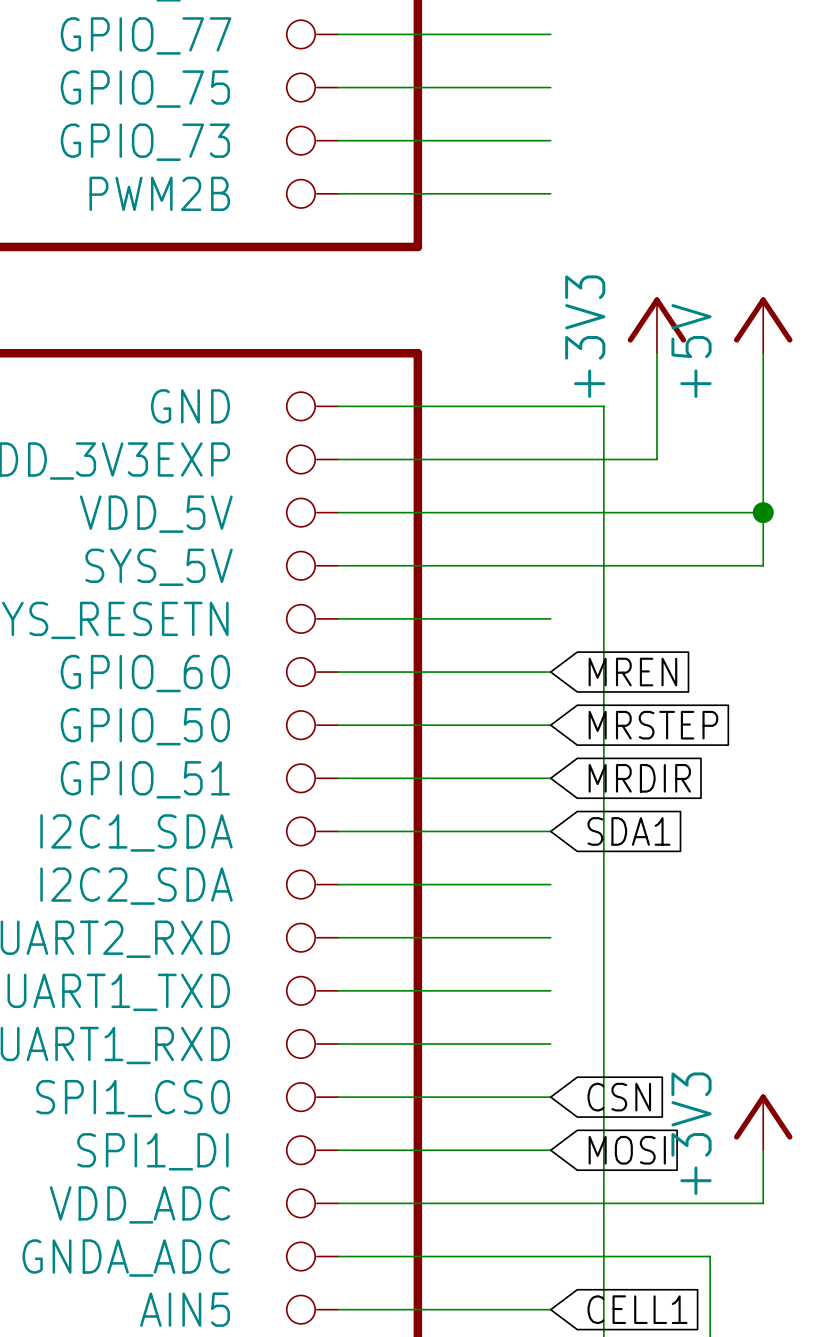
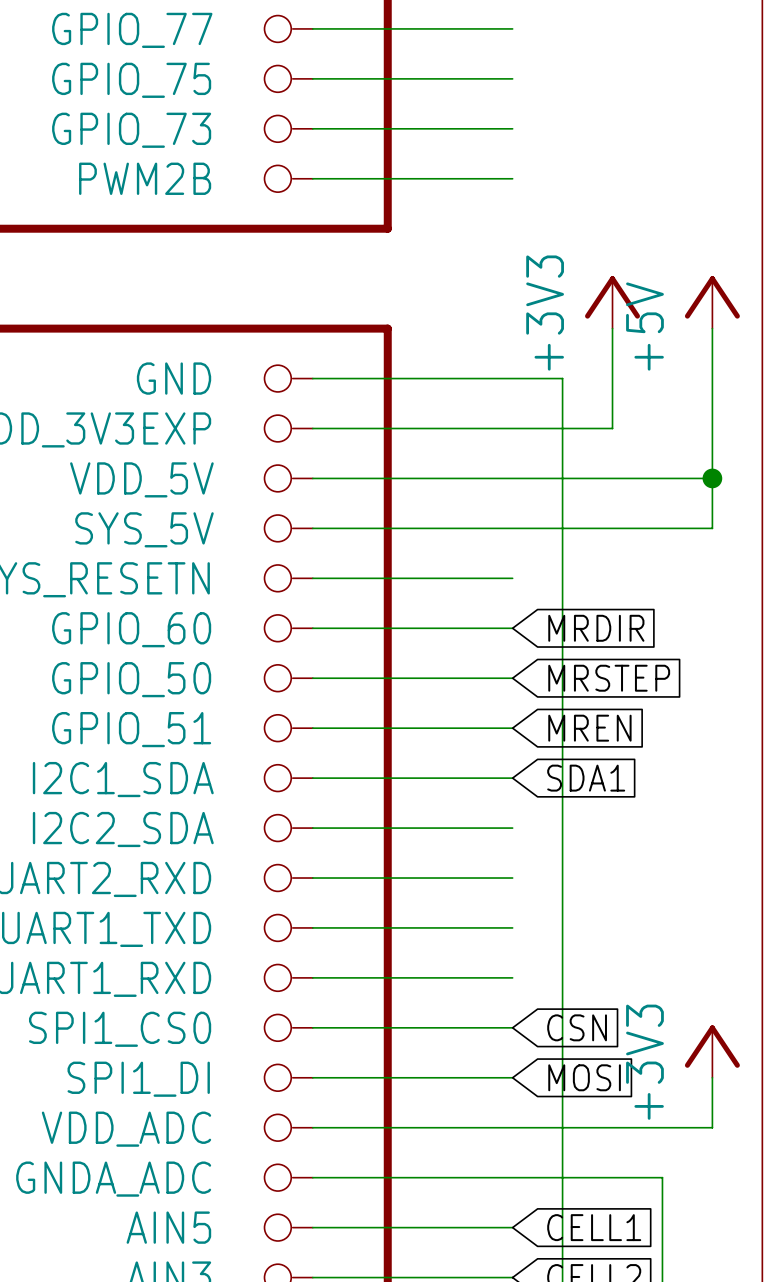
global label: MREN (632, 672) -> MRDIR (596, 628)
global label: MRDIR (639, 778) -> MREN (589, 728)

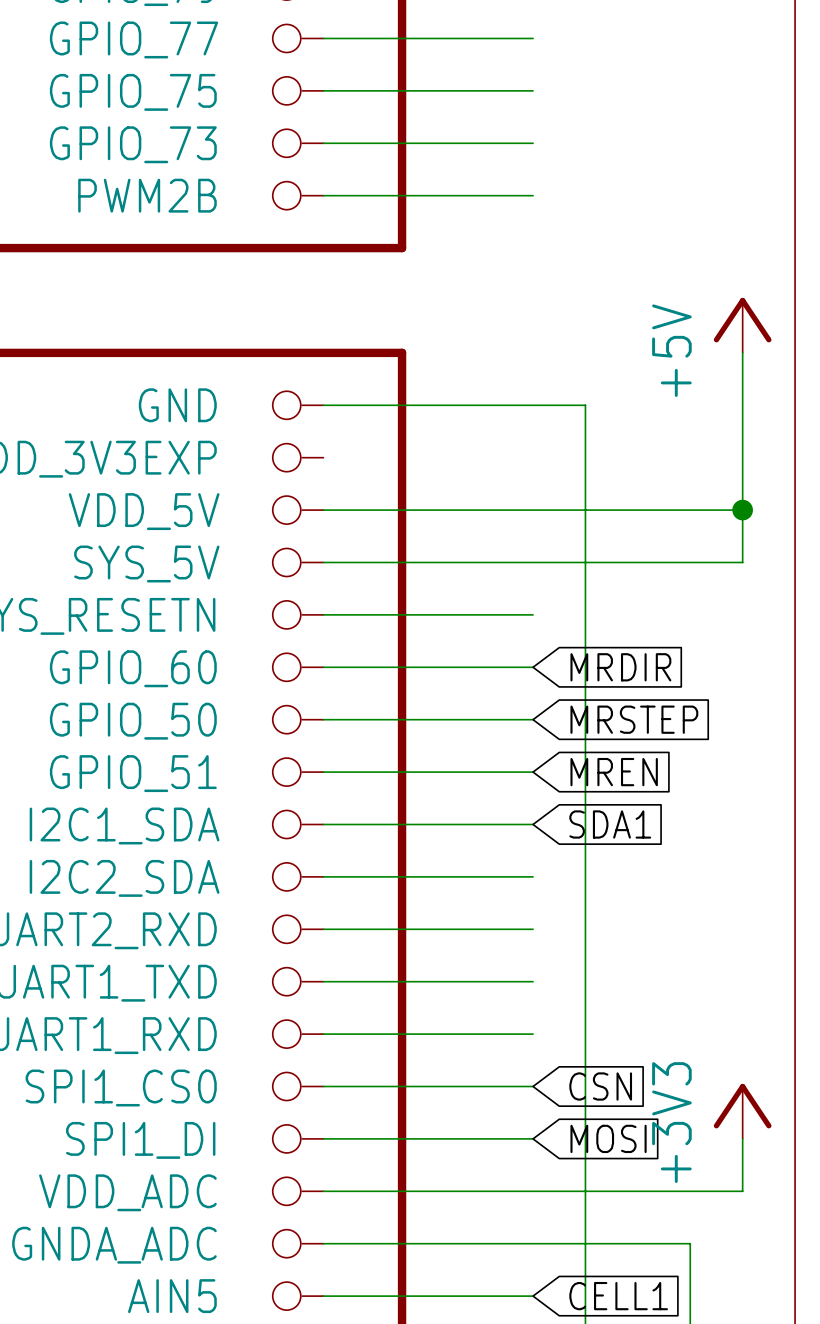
power symbol: +3V3 (612, 302) -> none
wire: (612, 328) (612, 428) (312, 428) -> none

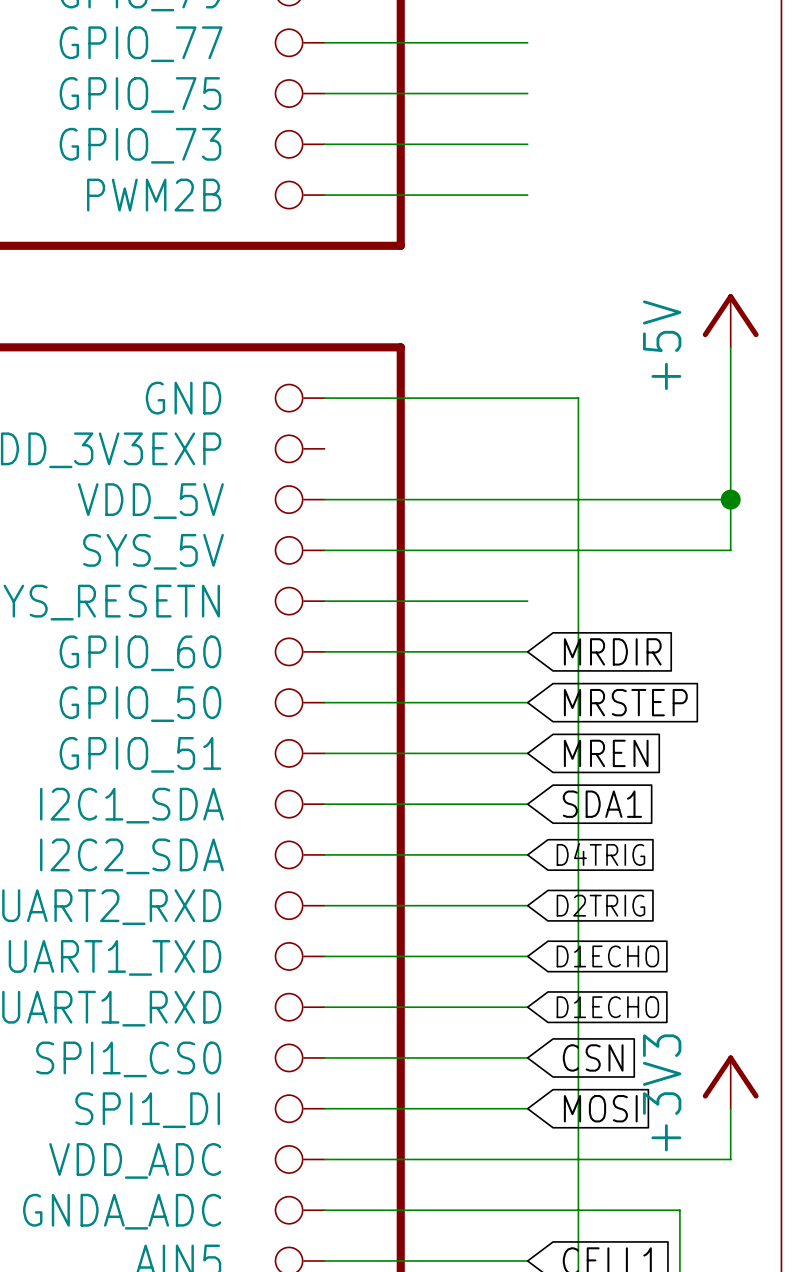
global label: none -> D4TRIG (600, 854)
global label: none -> D2TRIG (600, 905)
global label: none -> D1ECHO (607, 956)
global label: none -> D1ECHO (607, 1007)

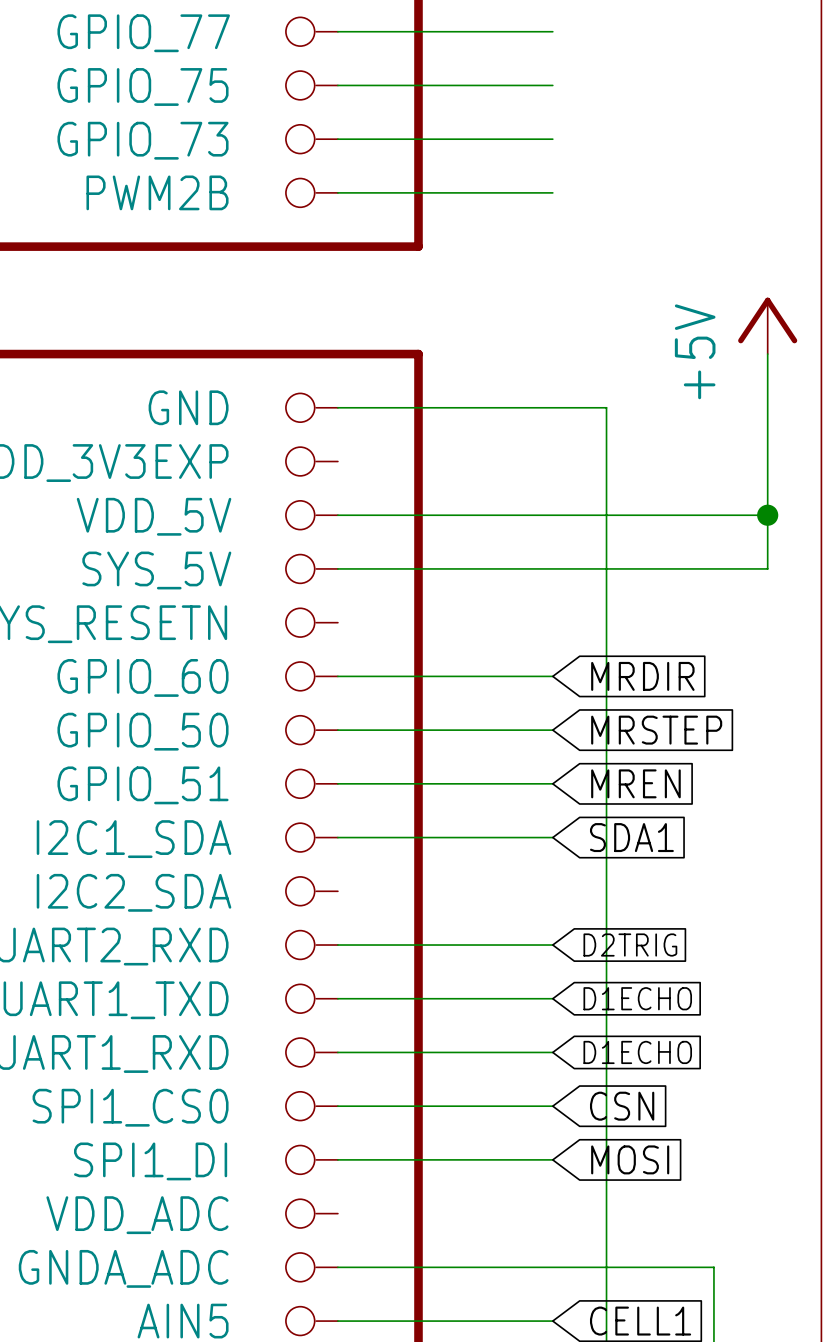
wire: (324, 601) (527, 601) -> none
wire: (324, 854) (527, 854) -> none
global label: D4TRIG (600, 854) -> none
power symbol: +3V3 (730, 1082) -> none
wire: (730, 1108) (730, 1159) (324, 1159) -> none

